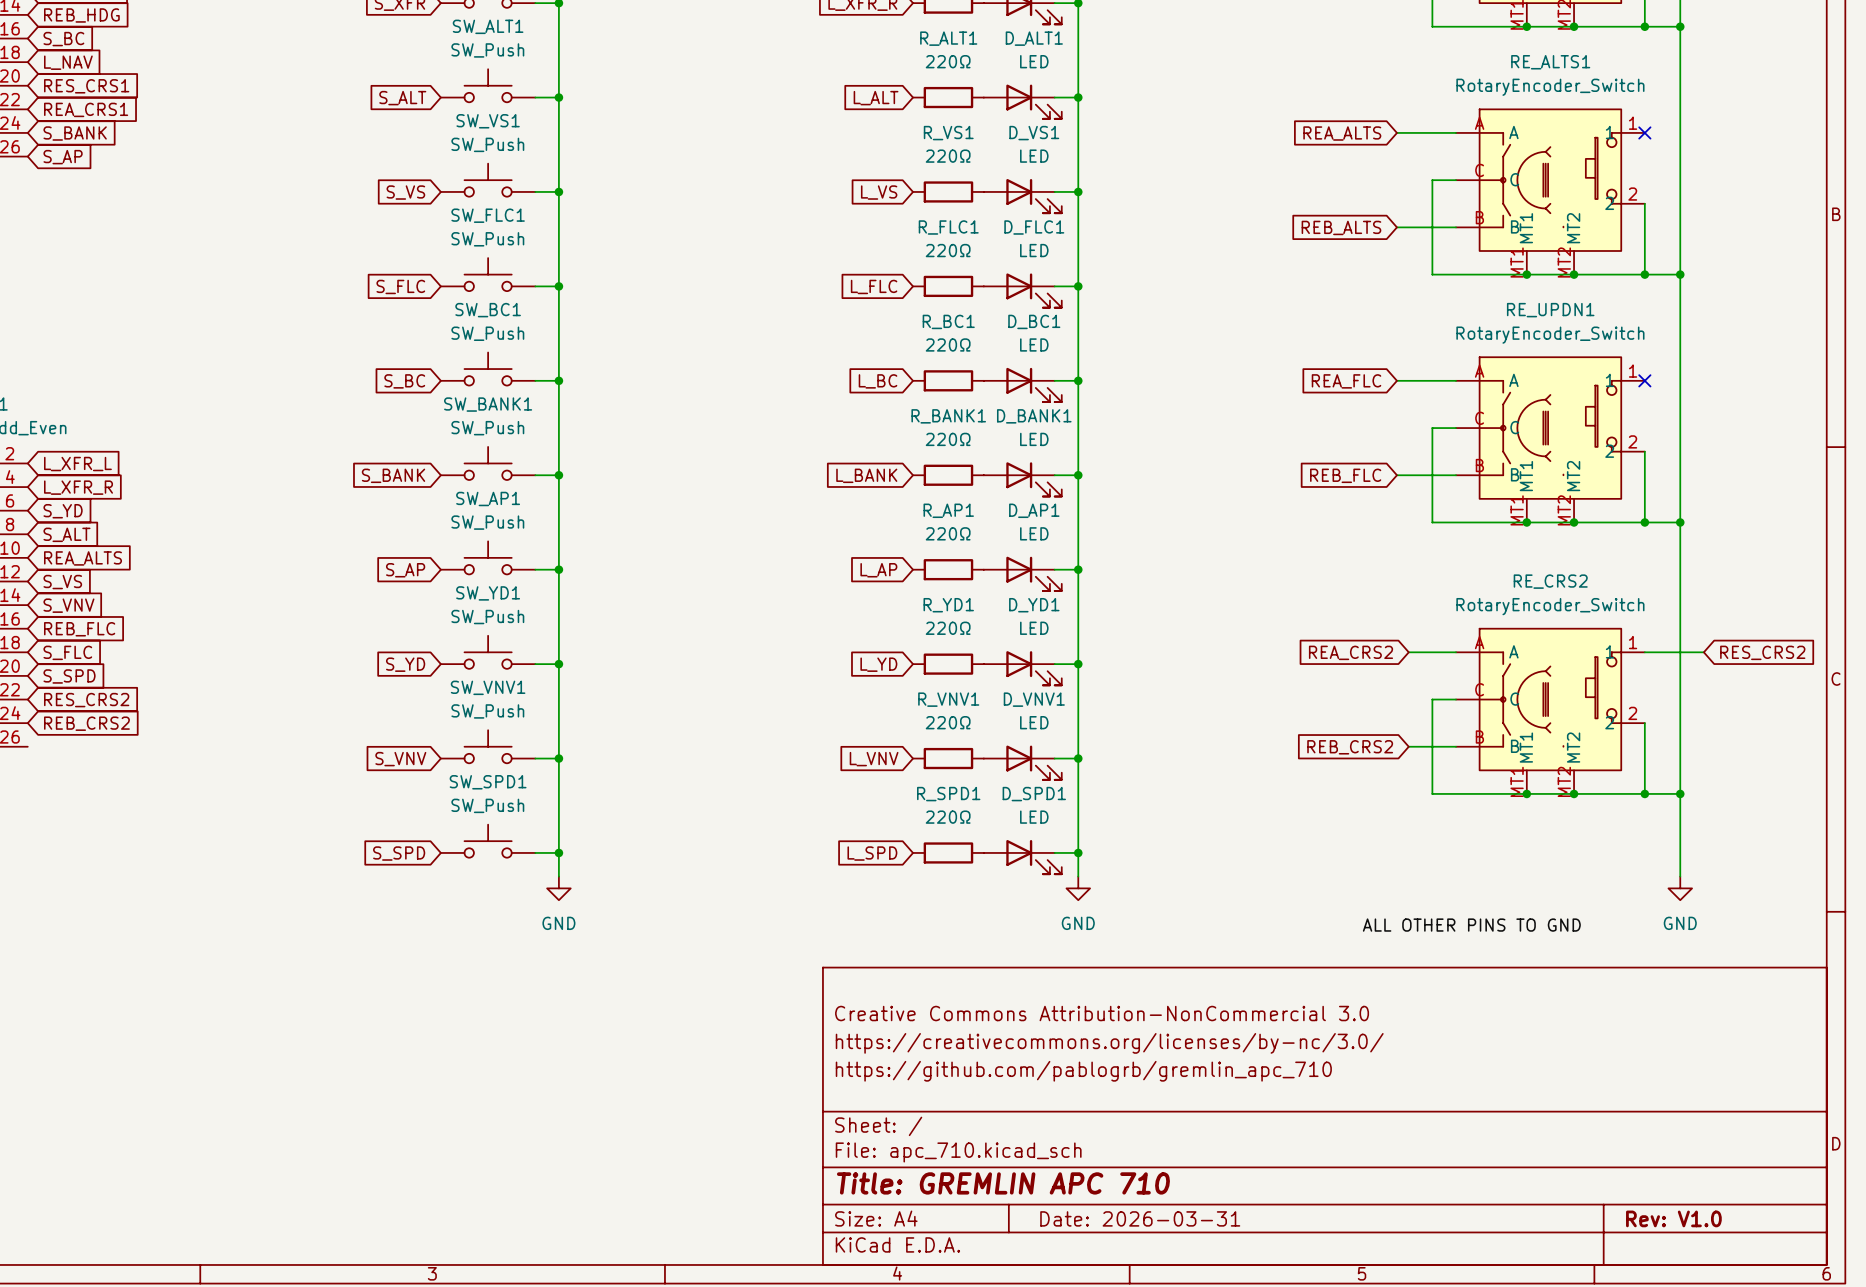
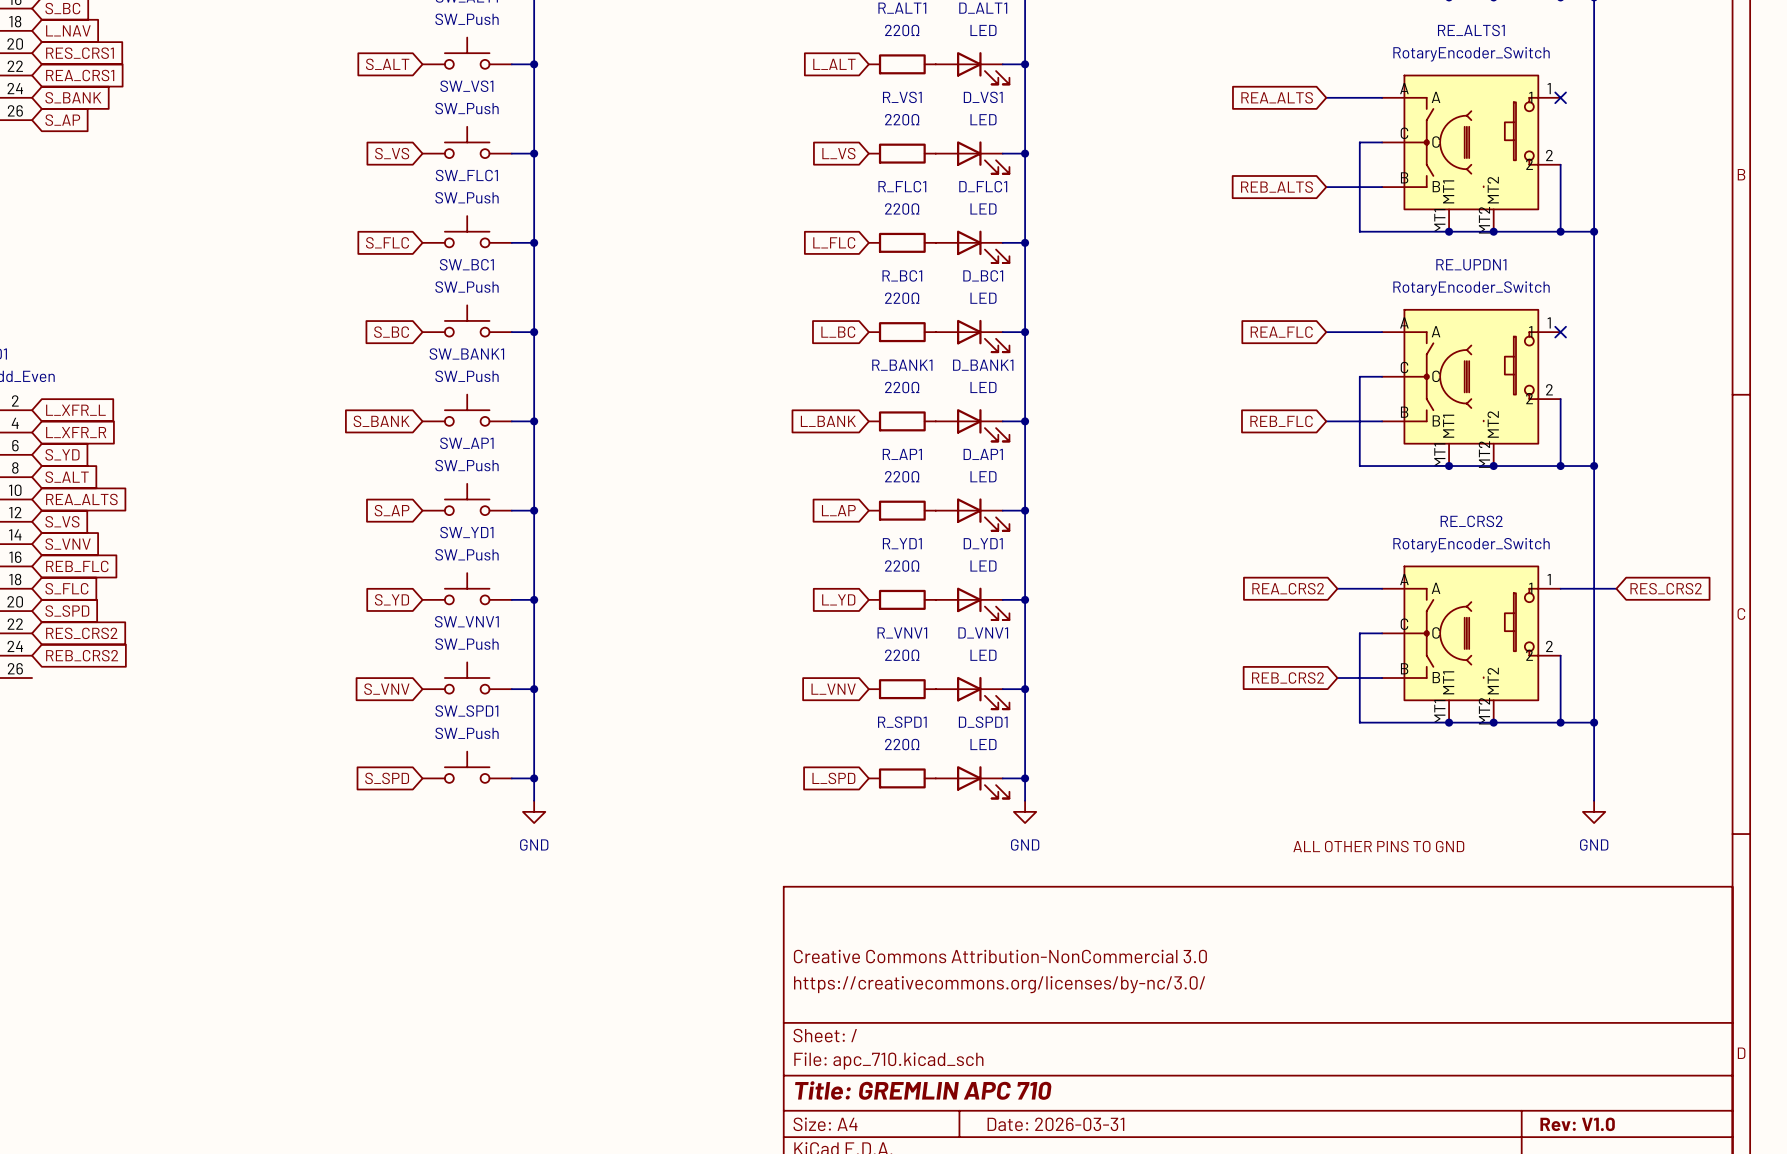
title block: Creative Commons Attribution-NonCommercial 3.0 (1102, 1013) -> none
title block: https://creativecommons.org/licenses/by-nc/3.0/ (1109, 1043) -> Creative Commons Attribution-NonCommercial 3.0 (1000, 956)
title block: https://github.com/pablogrb/gremlin_apc_710 (1083, 1071) -> https://creativecommons.org/licenses/by-nc/3.0/ (999, 984)

